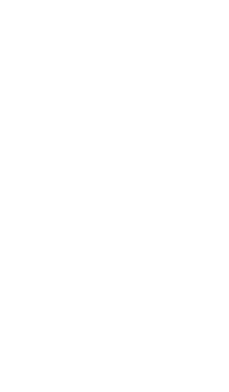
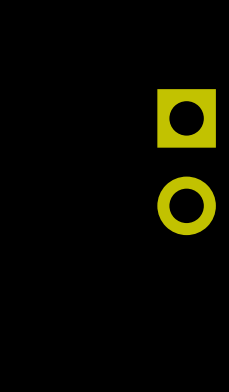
part: none -> (186, 162)

